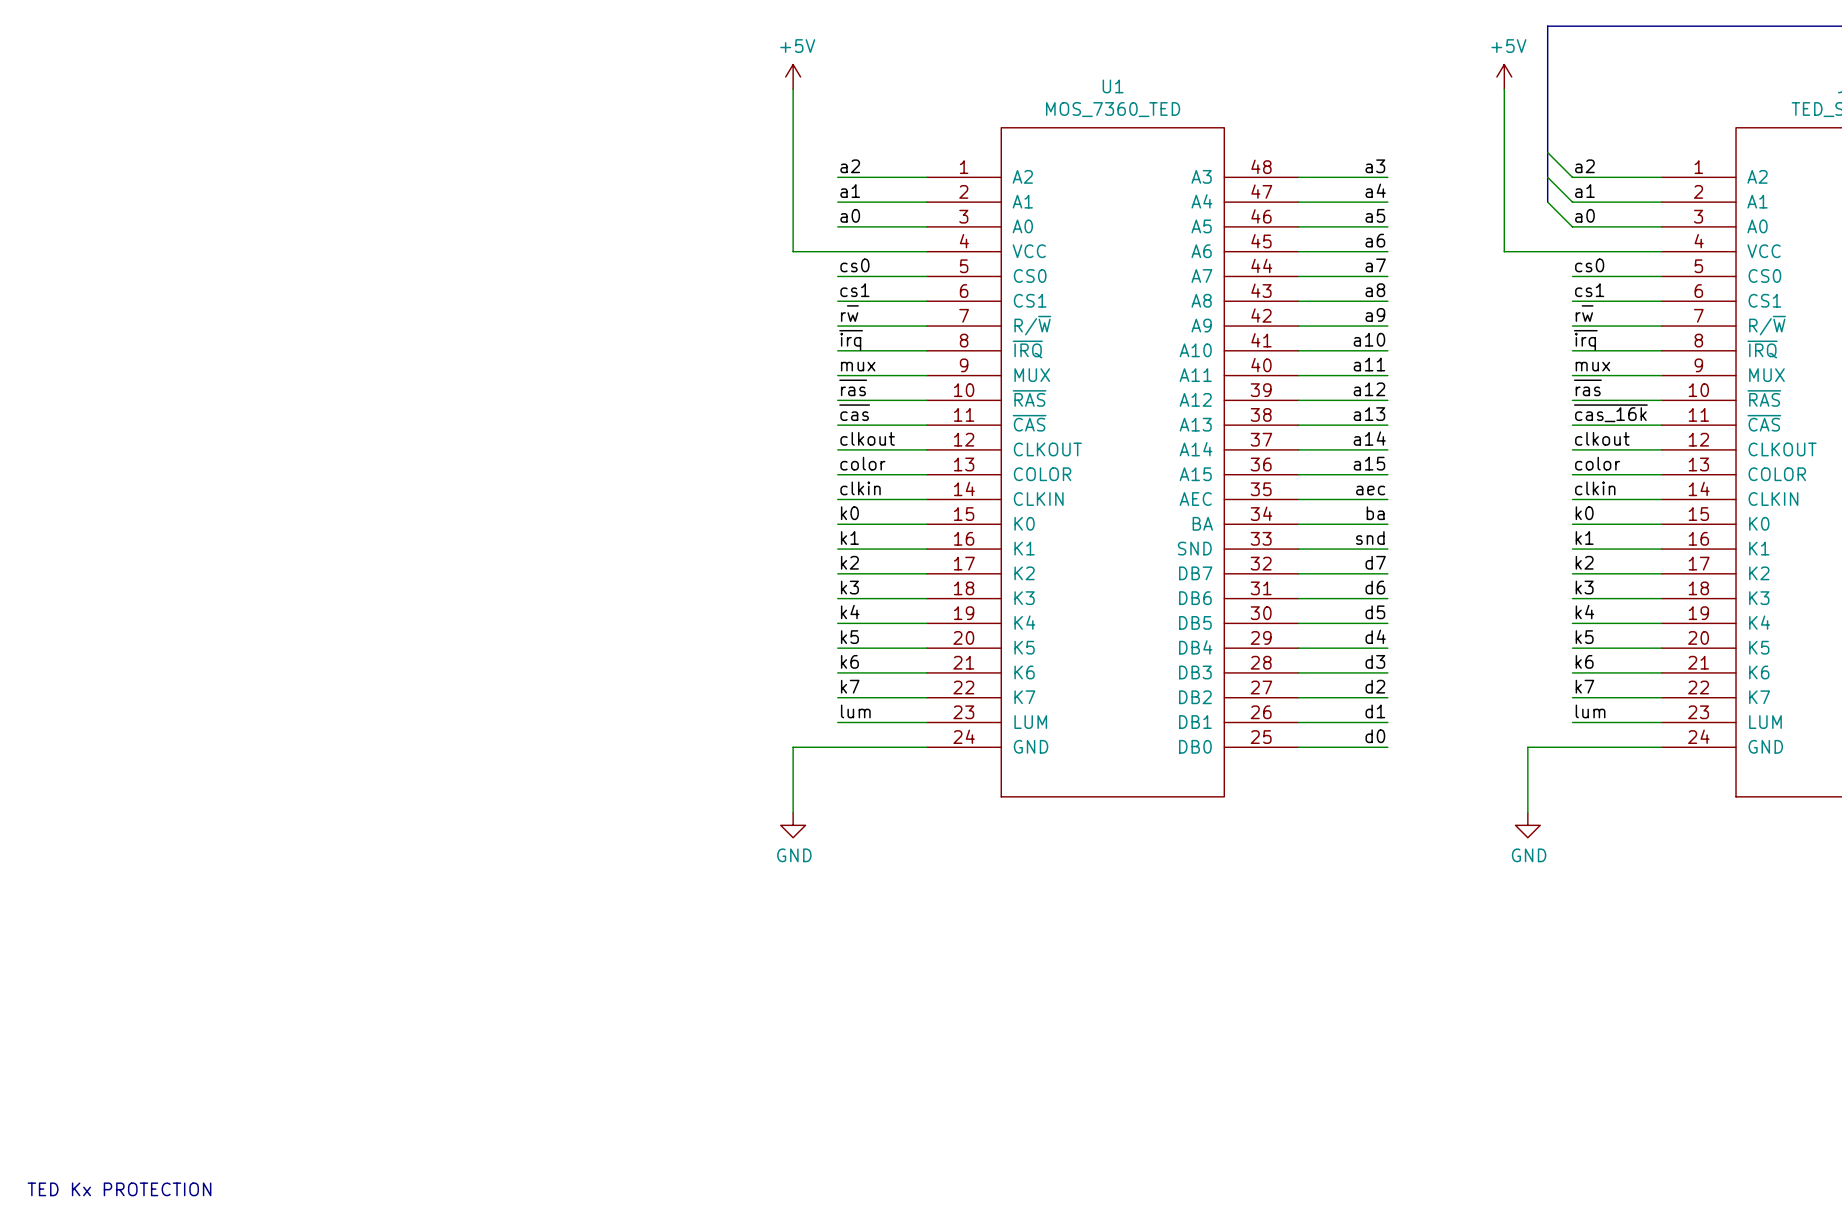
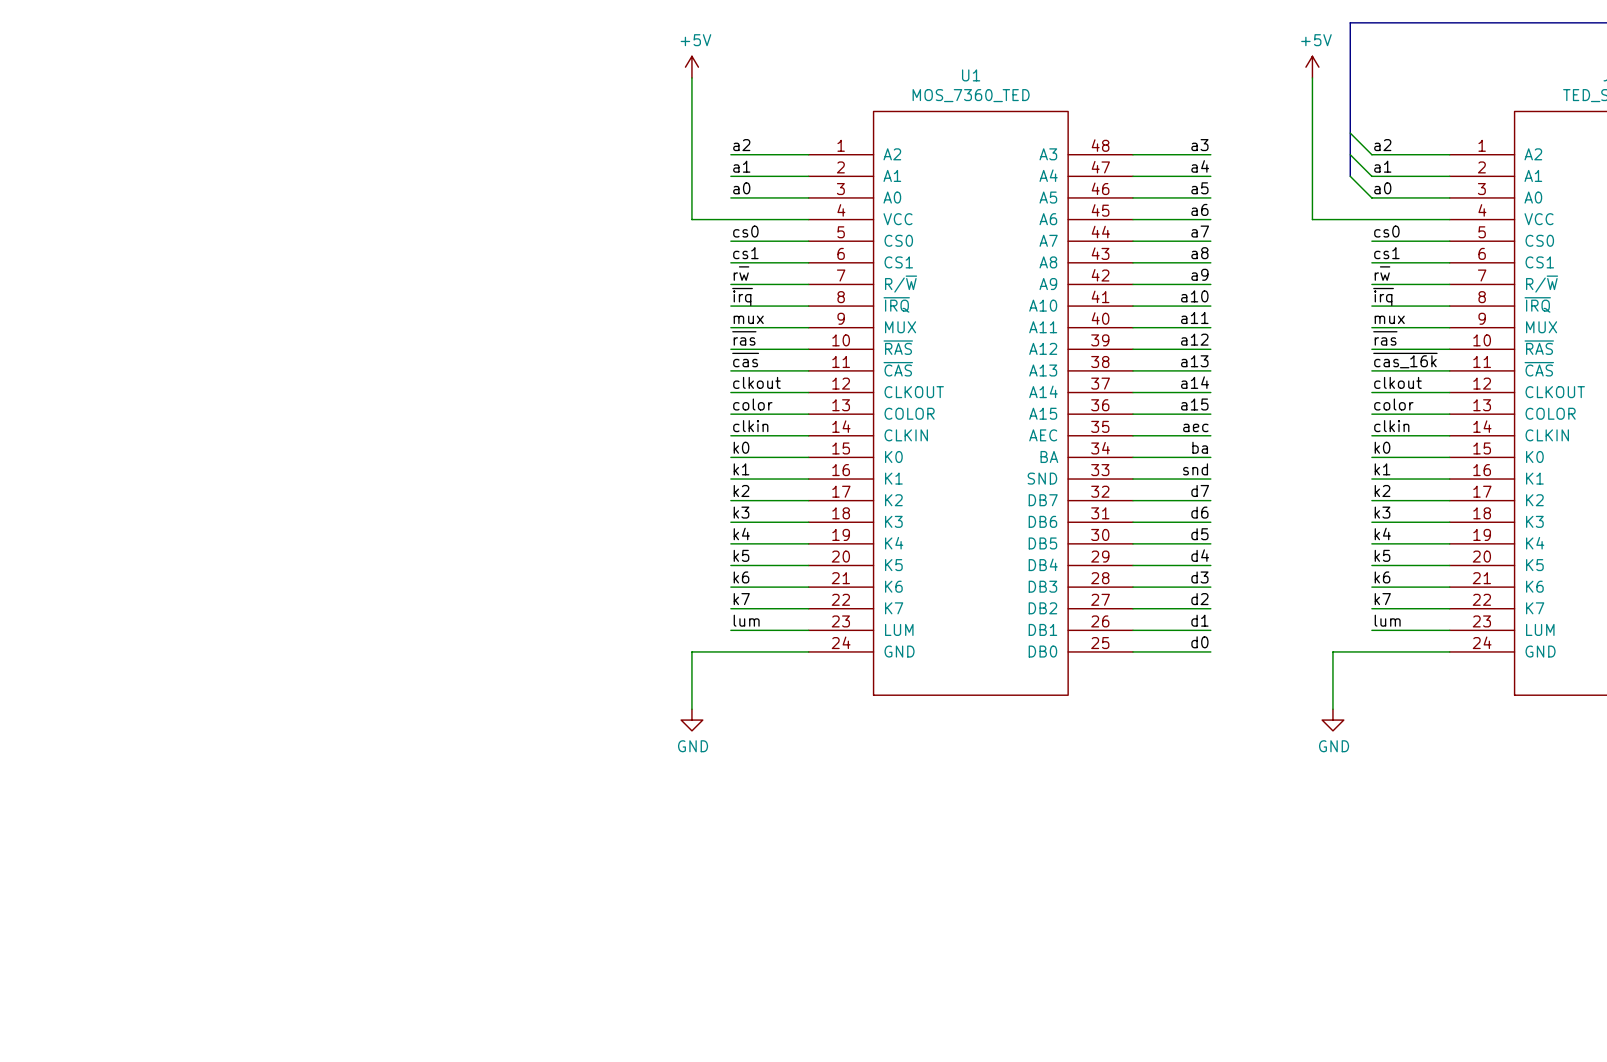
text: TED Kx PROTECTION (119, 1189) -> none

